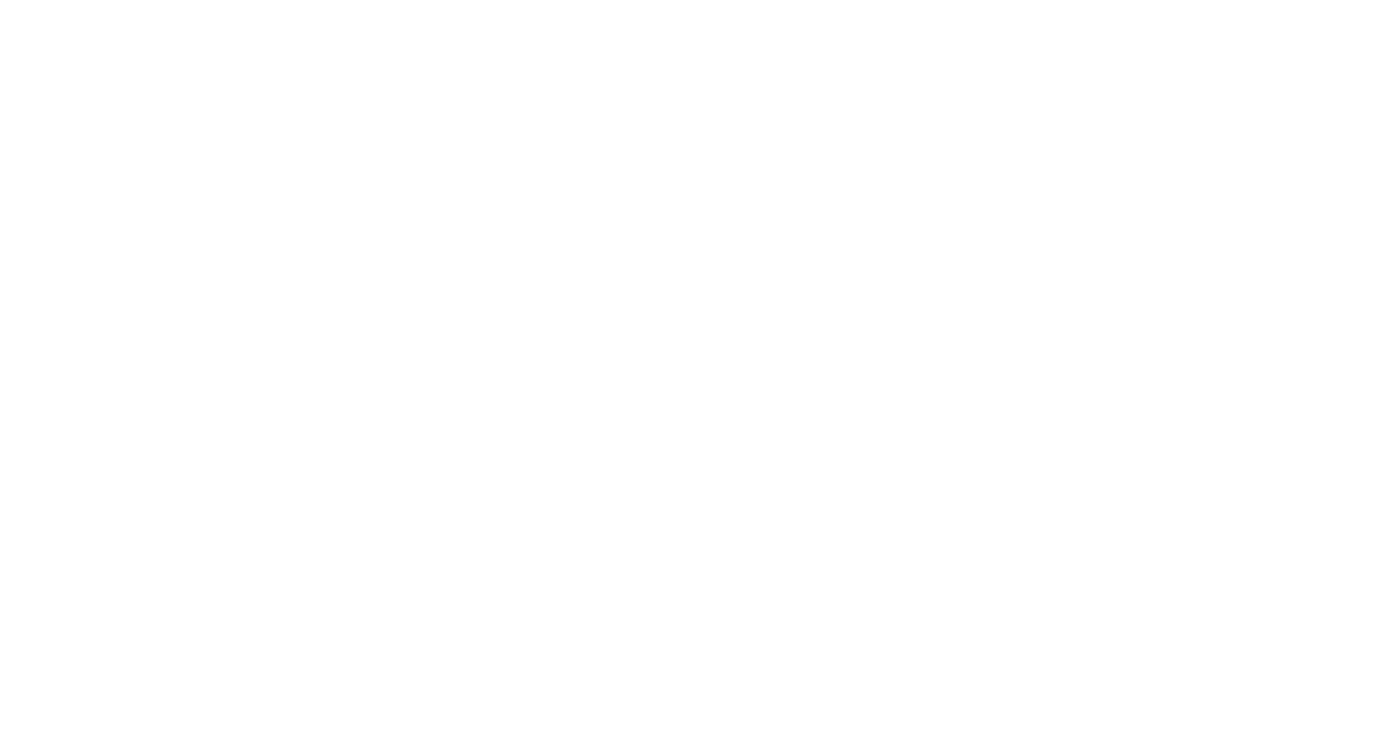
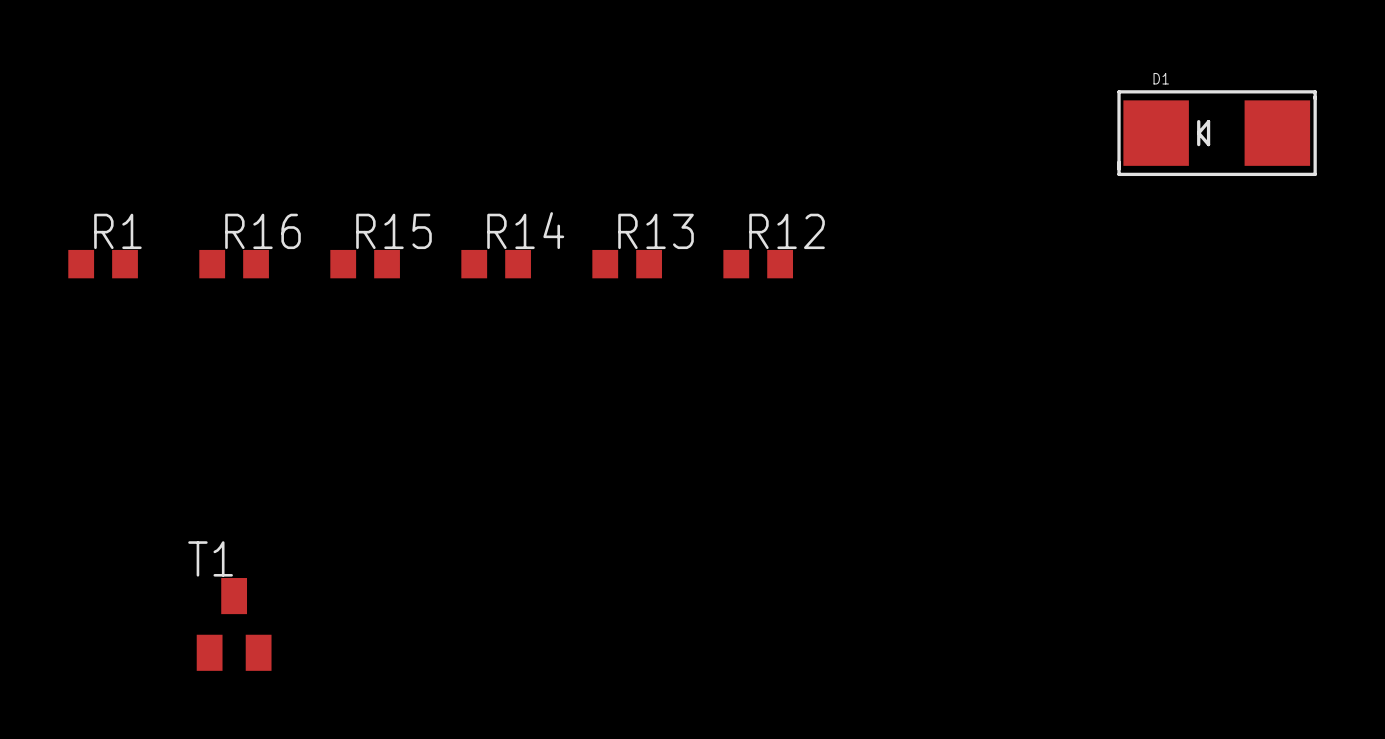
D1: none -> (1217, 133)
R1: none -> (103, 264)
R16: none -> (234, 264)
R15: none -> (365, 264)
R14: none -> (496, 264)
R13: none -> (627, 264)
R12: none -> (758, 264)
T1: none -> (234, 624)

